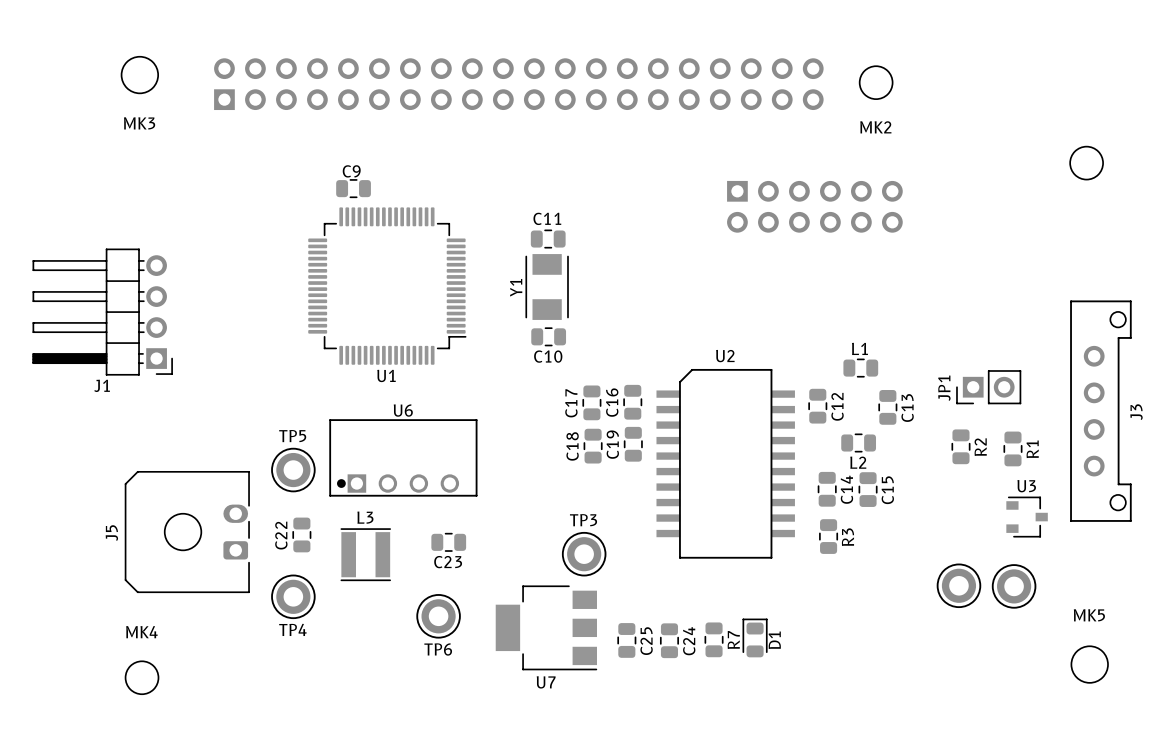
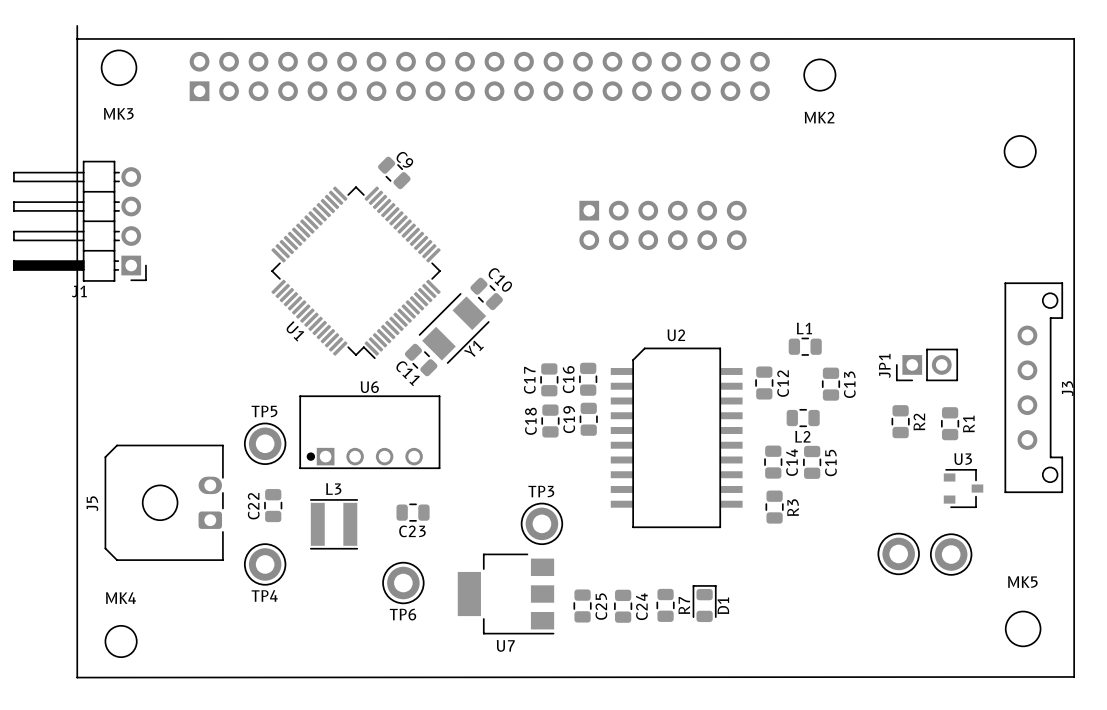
board edge: none -> (77, 25) (77, 677) (1074, 676) (1074, 38) (76, 38)
C9 rotation: 0° (353, 188) -> 45° clockwise (394, 172)
C9 position: (353, 188) -> (394, 172)
part position: (814, 206) -> (662, 225)
C11 name position: C11 (547, 218) -> C11 (408, 373)
C11 rotation: 0° (548, 239) -> 45° clockwise (421, 360)
C11 position: (548, 239) -> (421, 360)
U1 rotation: 0° (387, 286) -> 45° clockwise (356, 272)
Y1 name position: Y1 (516, 287) -> Y1 (473, 348)
Y1 rotation: 0° (547, 287) -> 45° clockwise (454, 328)
Y1 position: (547, 287) -> (454, 328)
J1 position: (102, 312) -> (79, 221)
C10 rotation: 0° (548, 336) -> 45° clockwise (486, 293)
C10 position: (548, 336) -> (486, 293)
C10 name position: C10 (548, 356) -> C10 (500, 279)

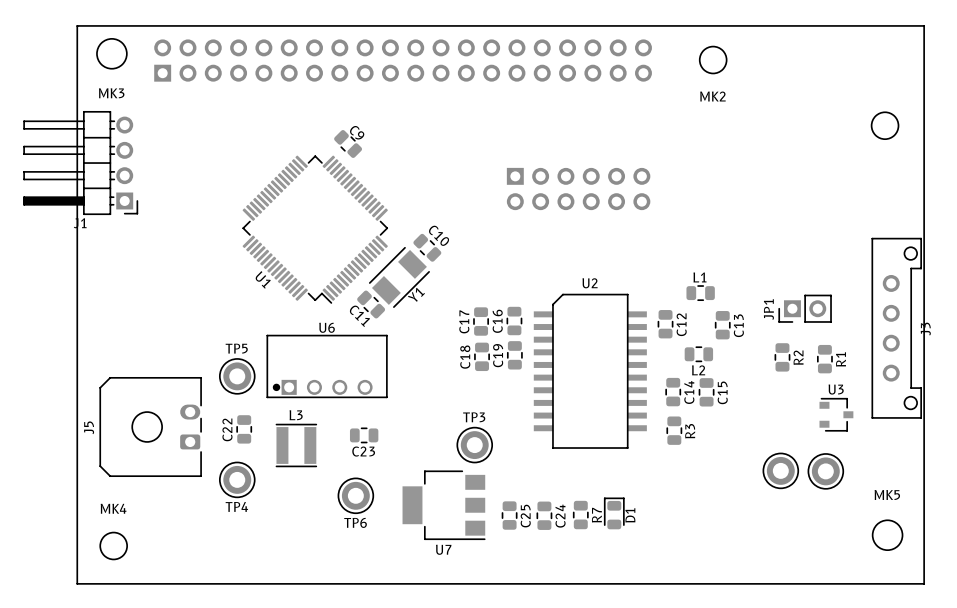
board edge: (77, 25) (77, 677) (1074, 676) (1074, 38) (76, 38) -> none
board edge: none -> (77, 25) (924, 25) (924, 583) (77, 583) (77, 25)
part position: (479, 76) -> (403, 60)
J1 position: (79, 221) -> (80, 163)

